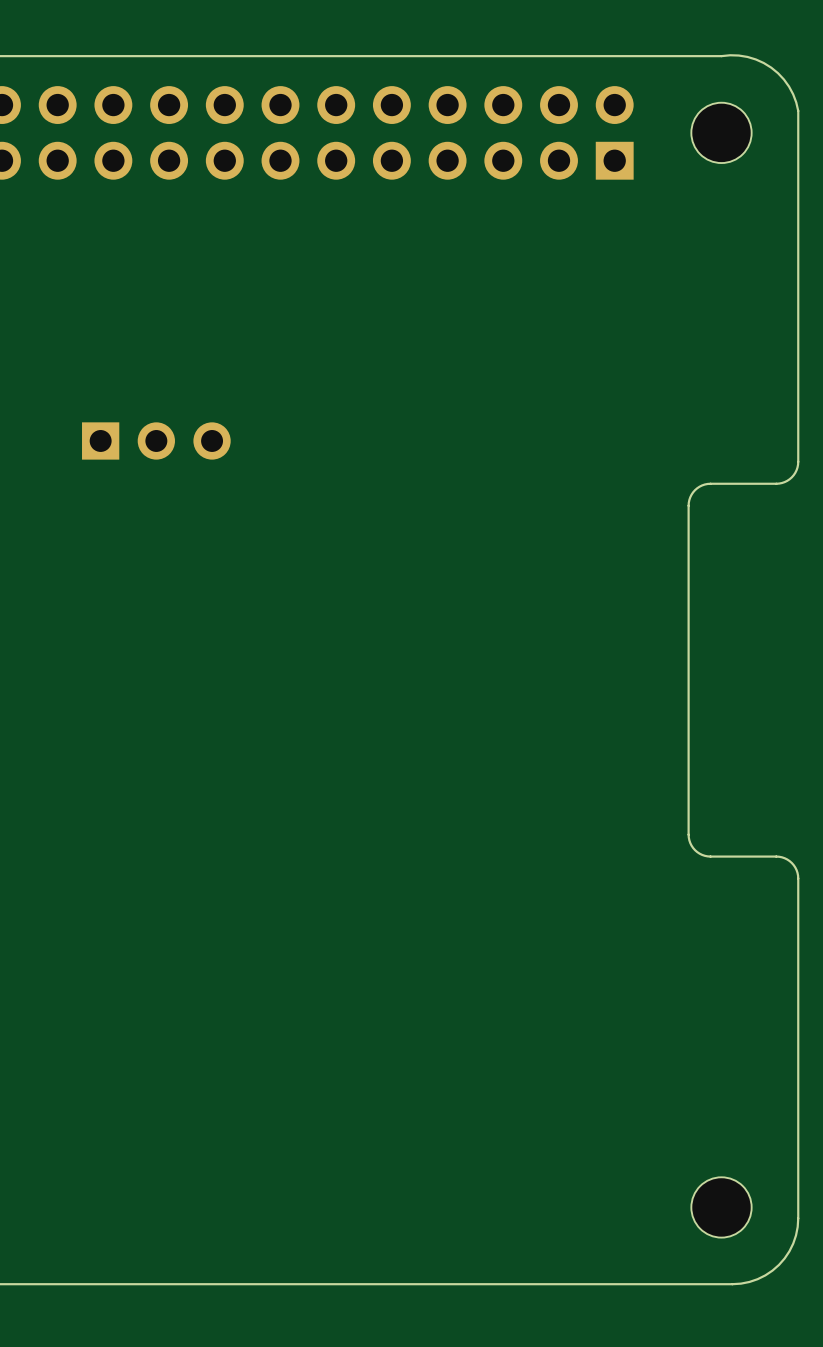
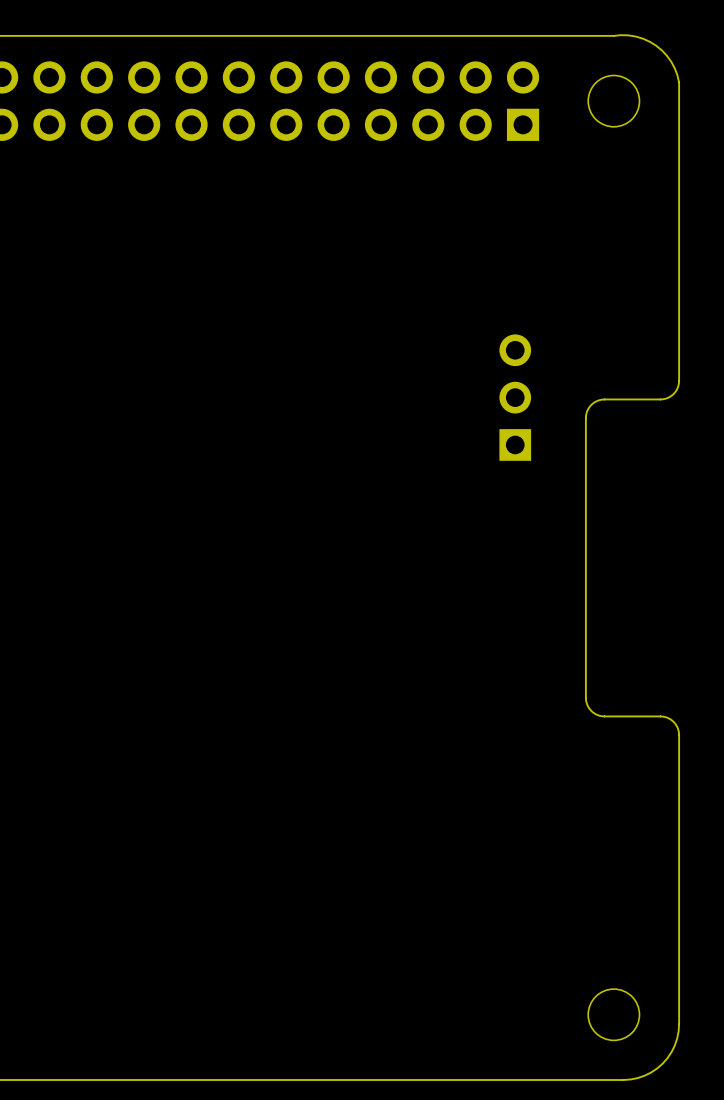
part rotation: 0° (156, 440) -> 90° counterclockwise (515, 397)
part position: (156, 440) -> (515, 397)

